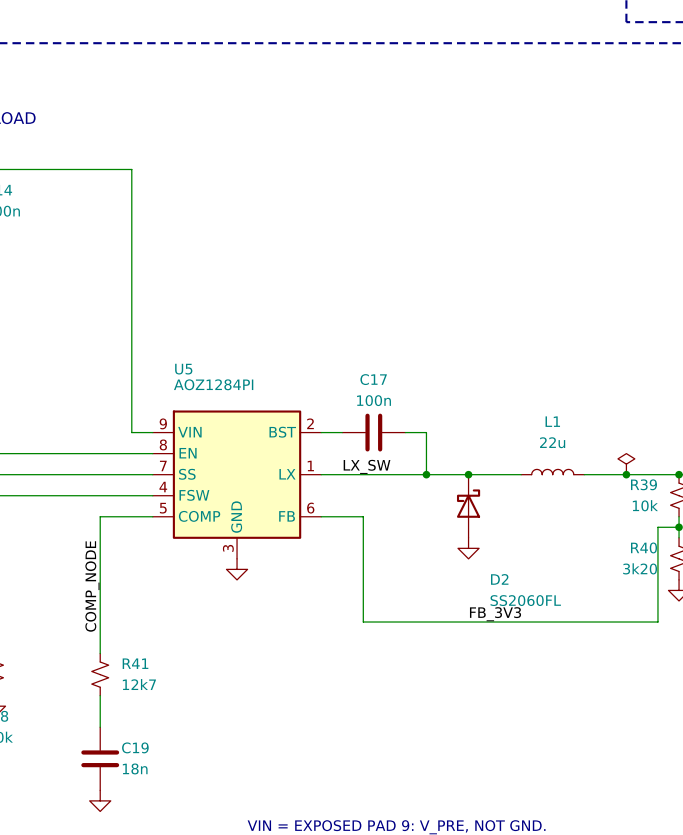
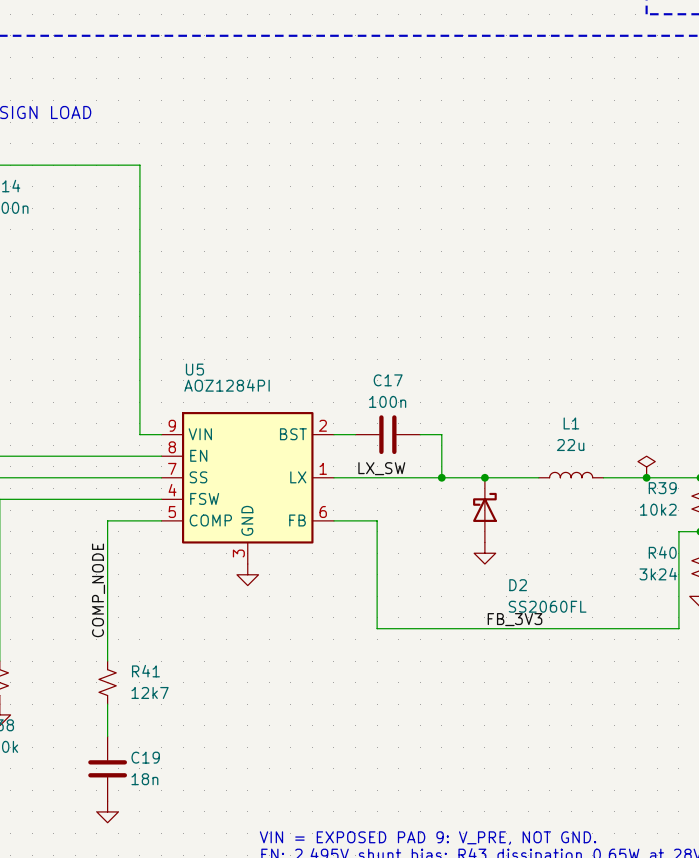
R39 value: 10k (645, 505) -> 10k2 (658, 509)
R40 value: 3k20 (640, 568) -> 3k24 (658, 574)

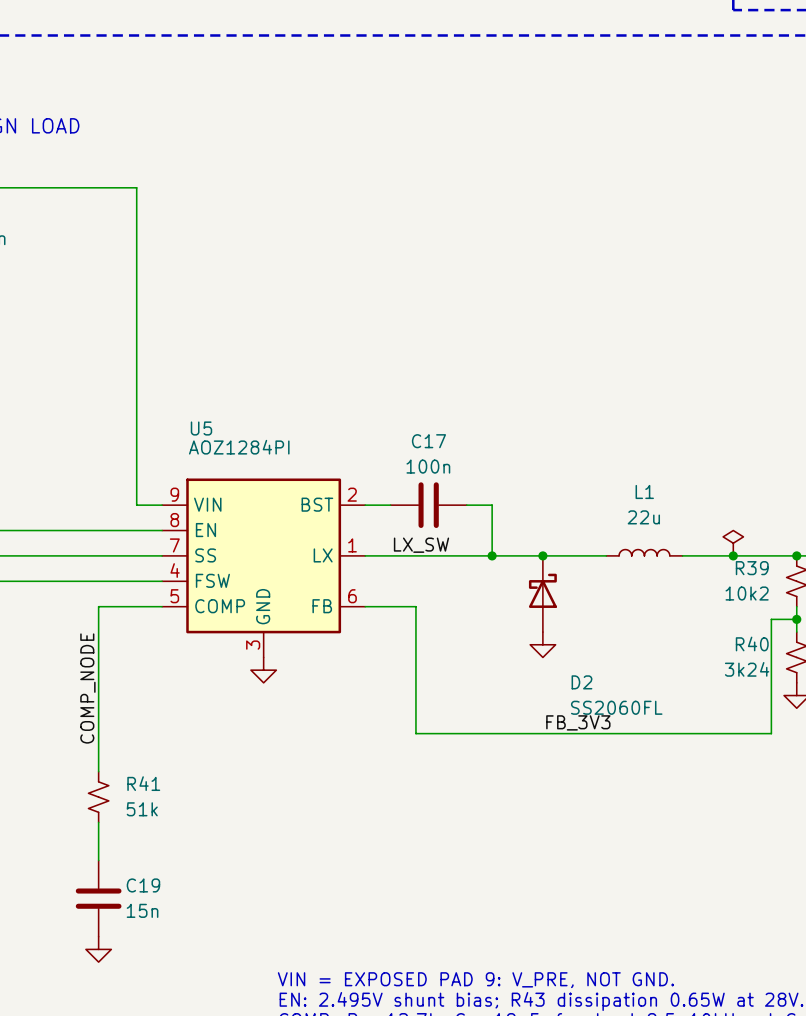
R41 value: 12k7 (150, 692) -> 51k (142, 809)
C19 value: 18n (144, 779) -> 15n (142, 910)

